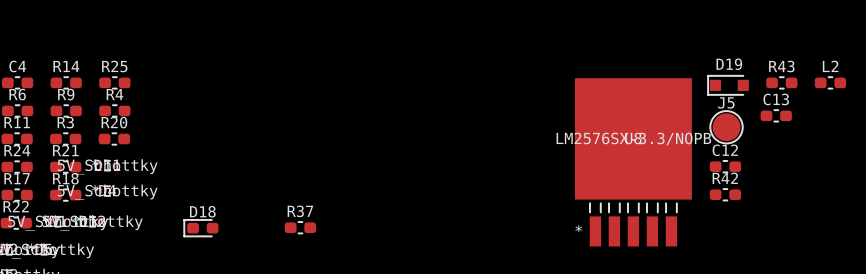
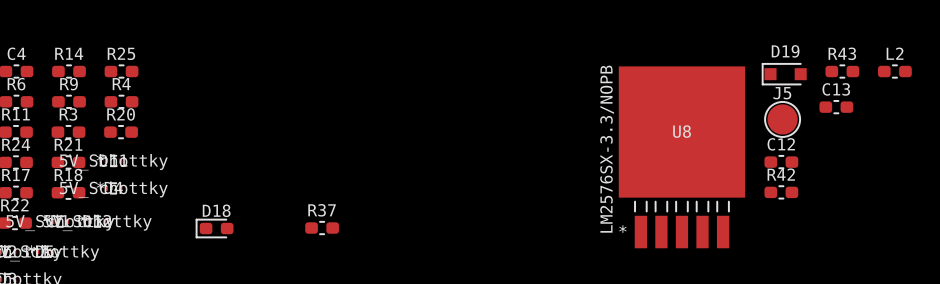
U8 value rotation: 0° (633, 139) -> 90° counterclockwise (607, 149)

